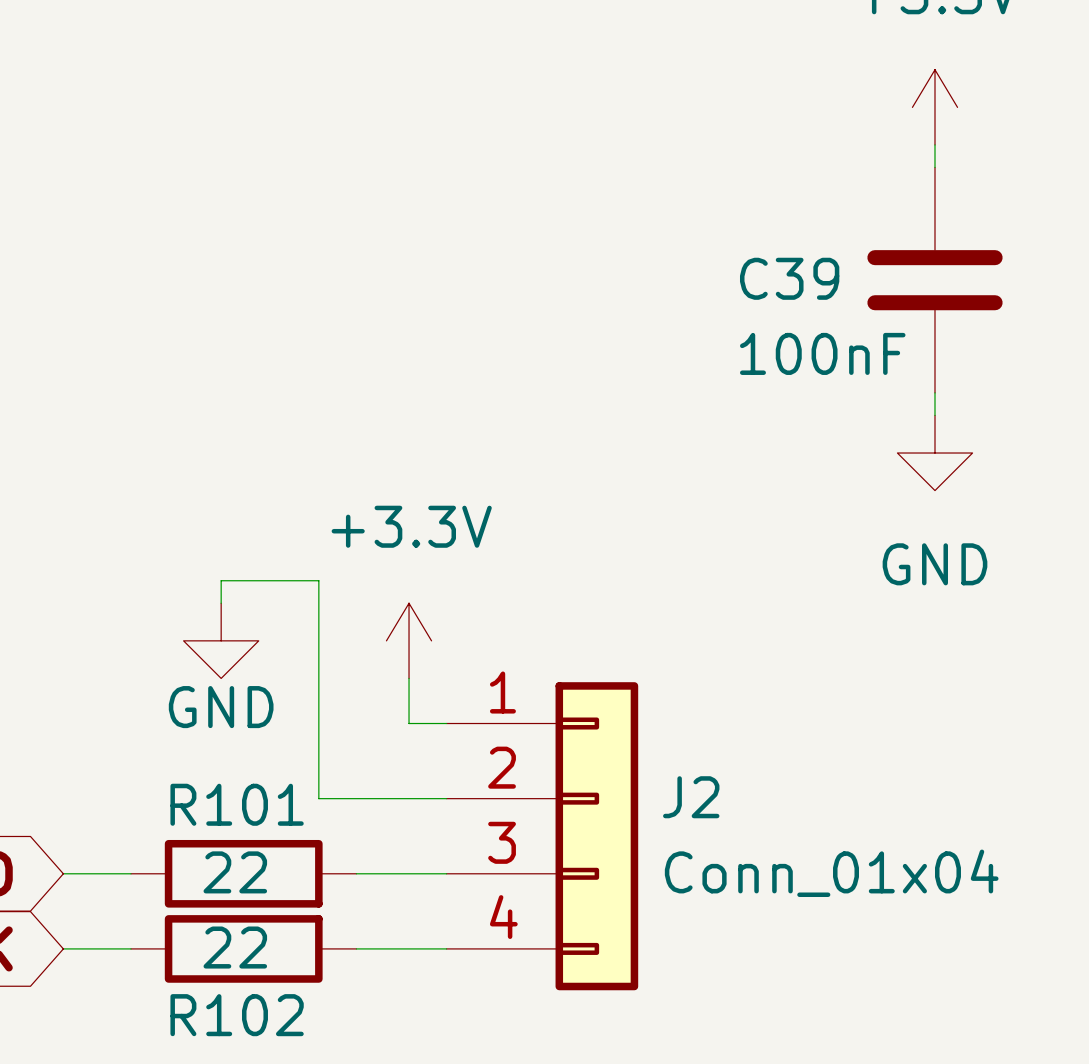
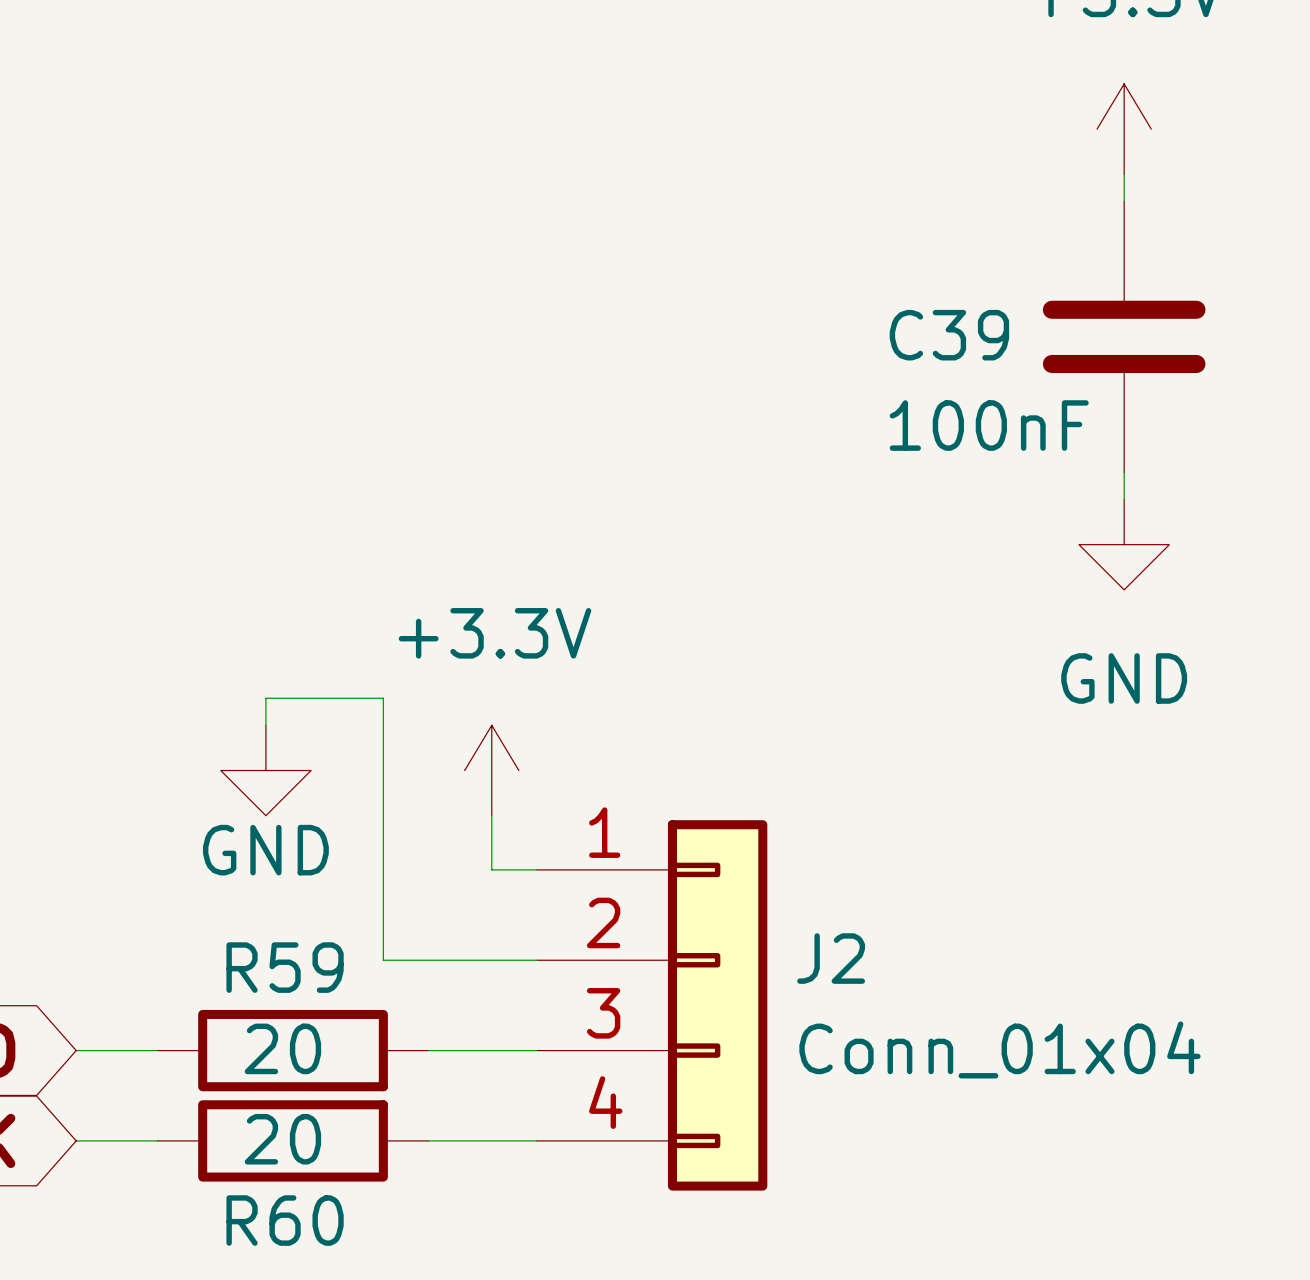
R101 name: R101 (237, 804) -> R59 (285, 967)
R101 value: 22 (235, 872) -> 20 (282, 1048)
R102 value: 22 (235, 947) -> 20 (282, 1139)
R102 name: R102 (237, 1015) -> R60 (285, 1220)

